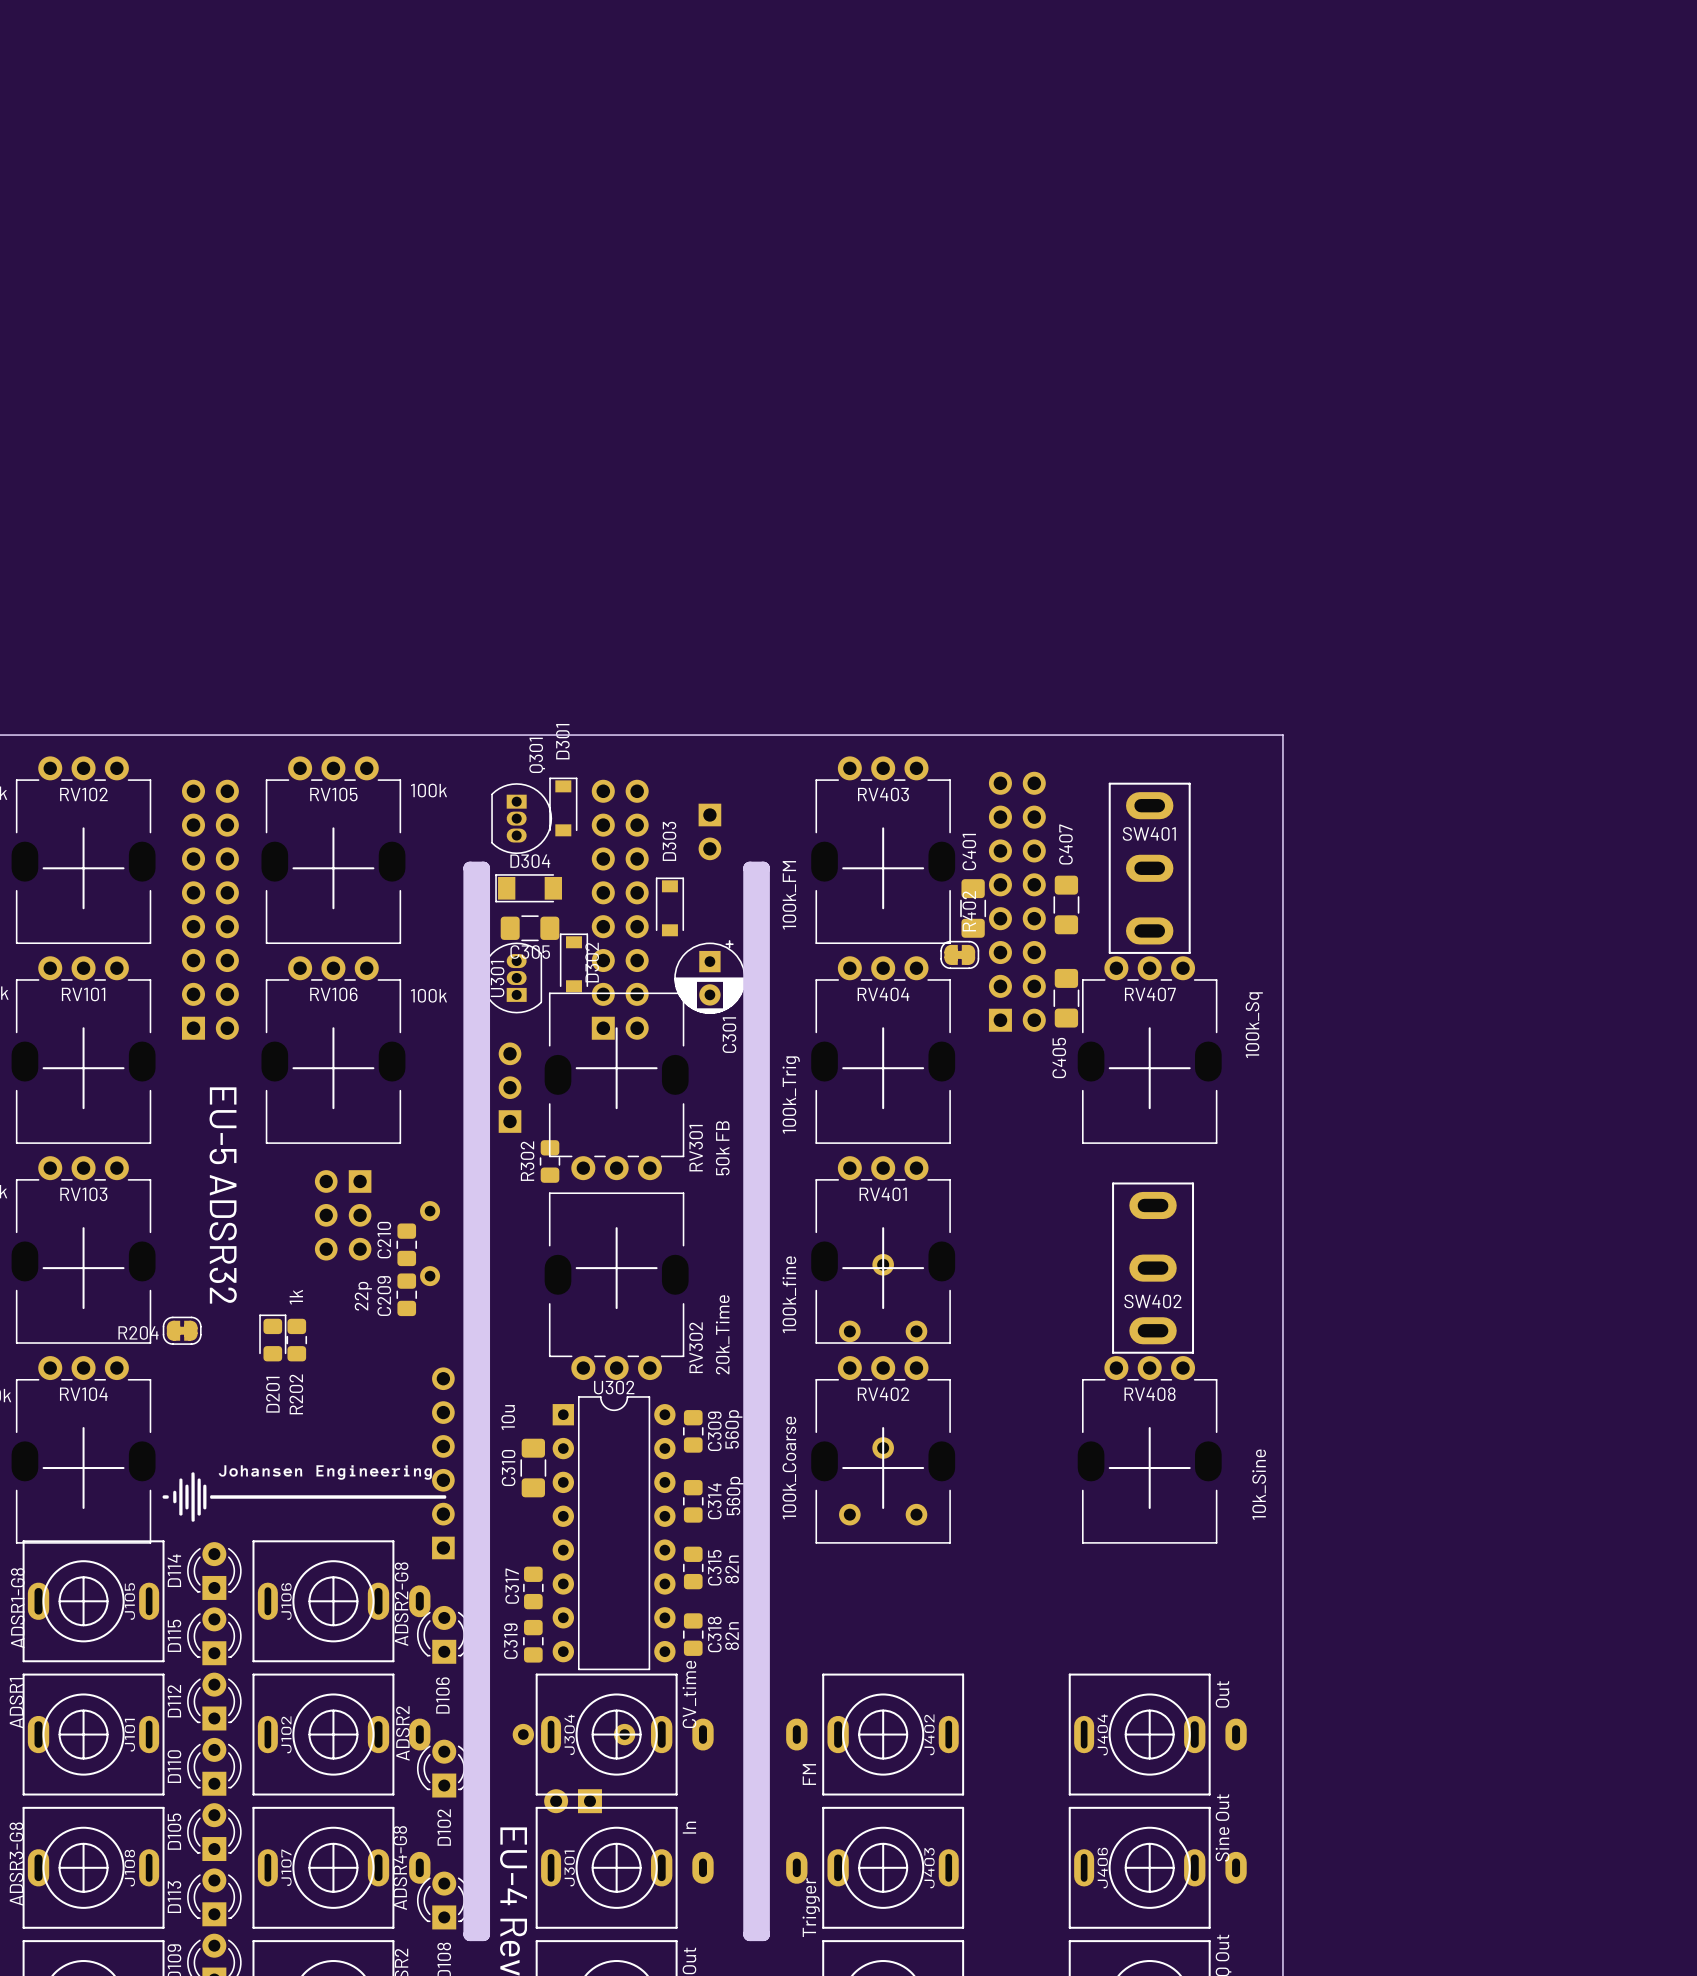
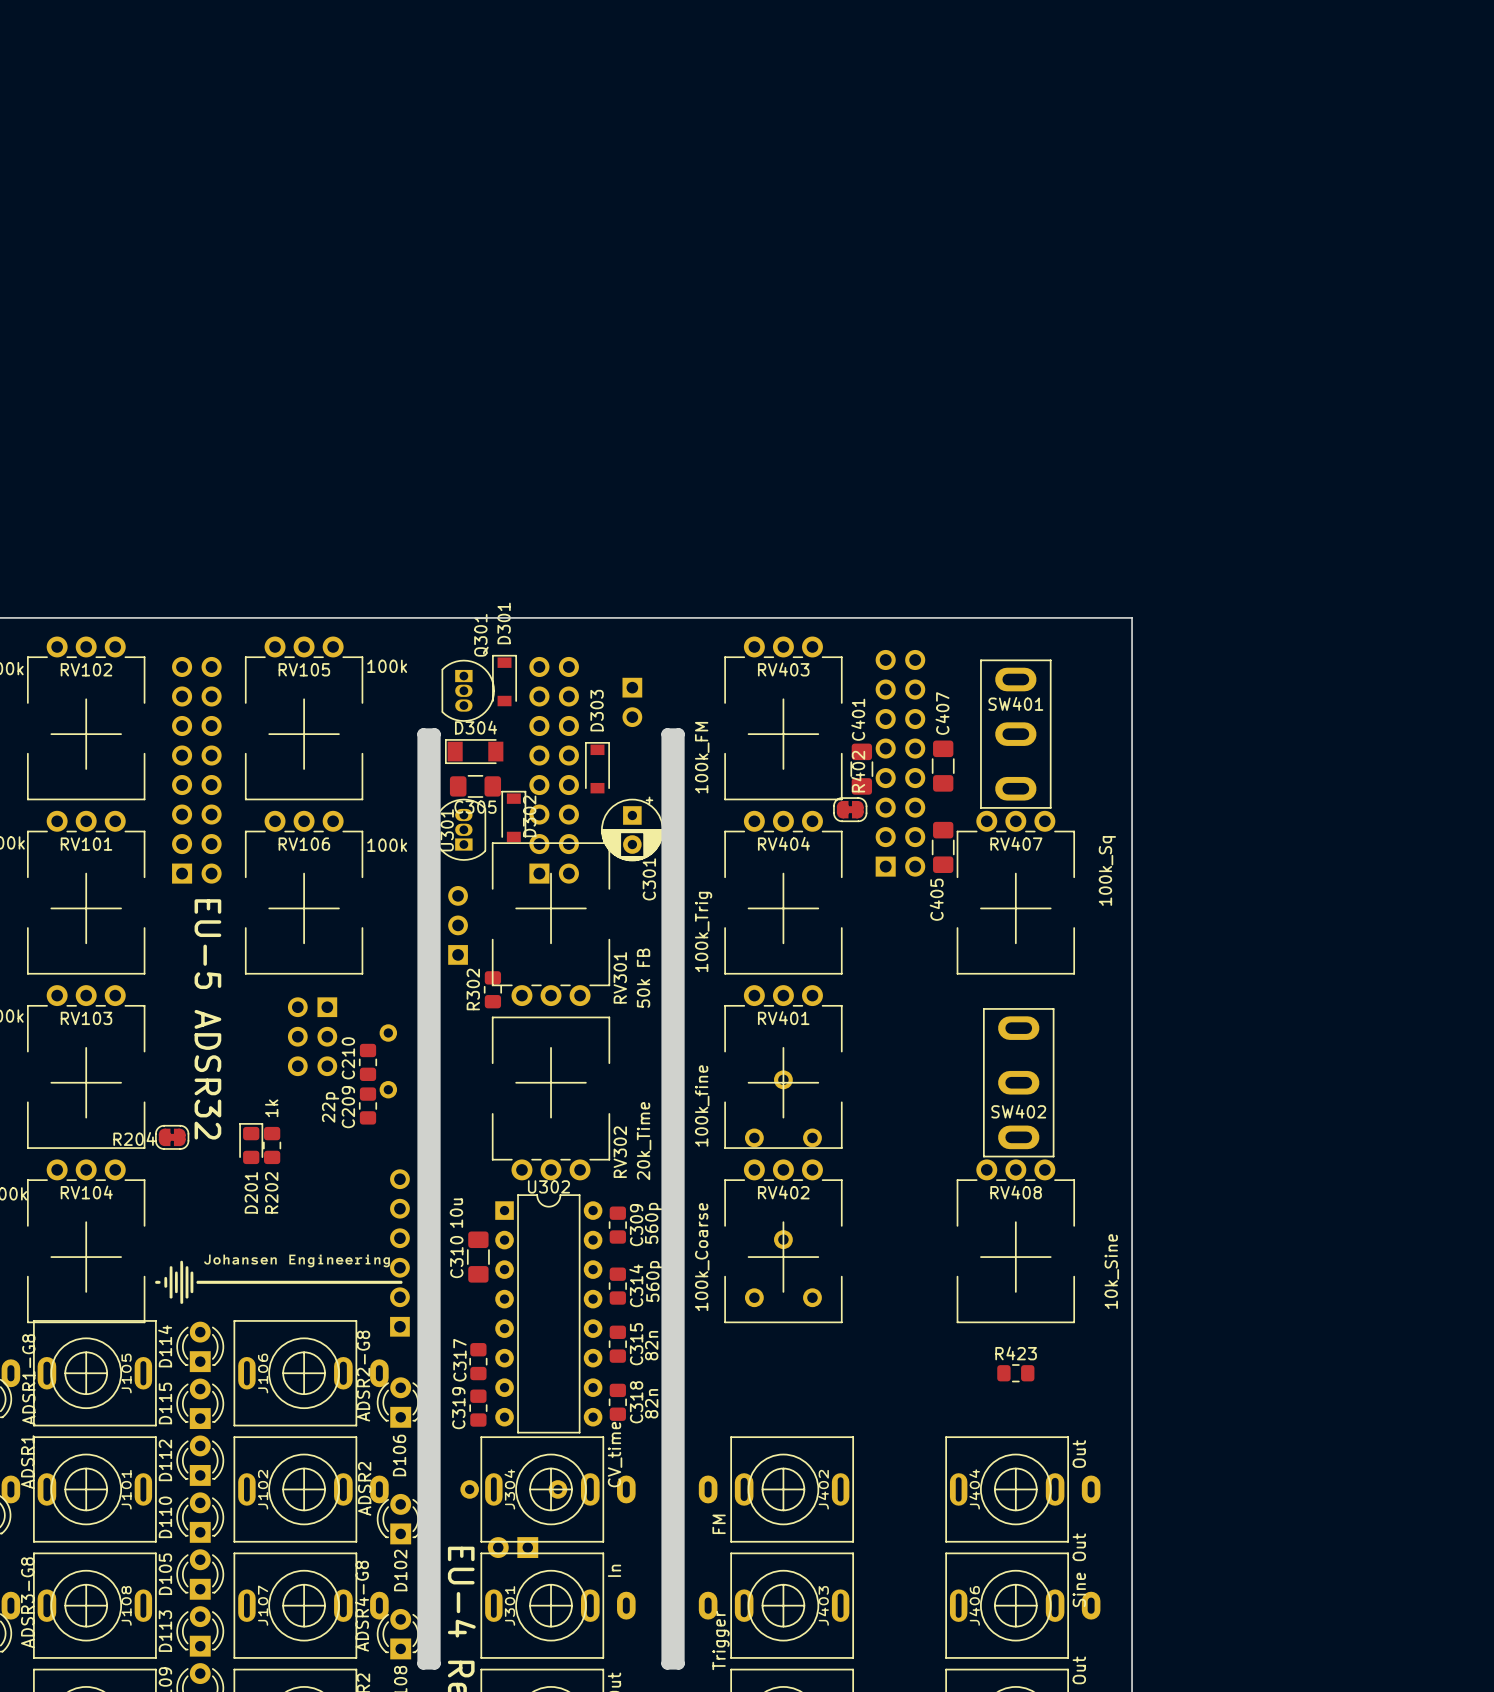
R423: none -> (1015, 1373)

